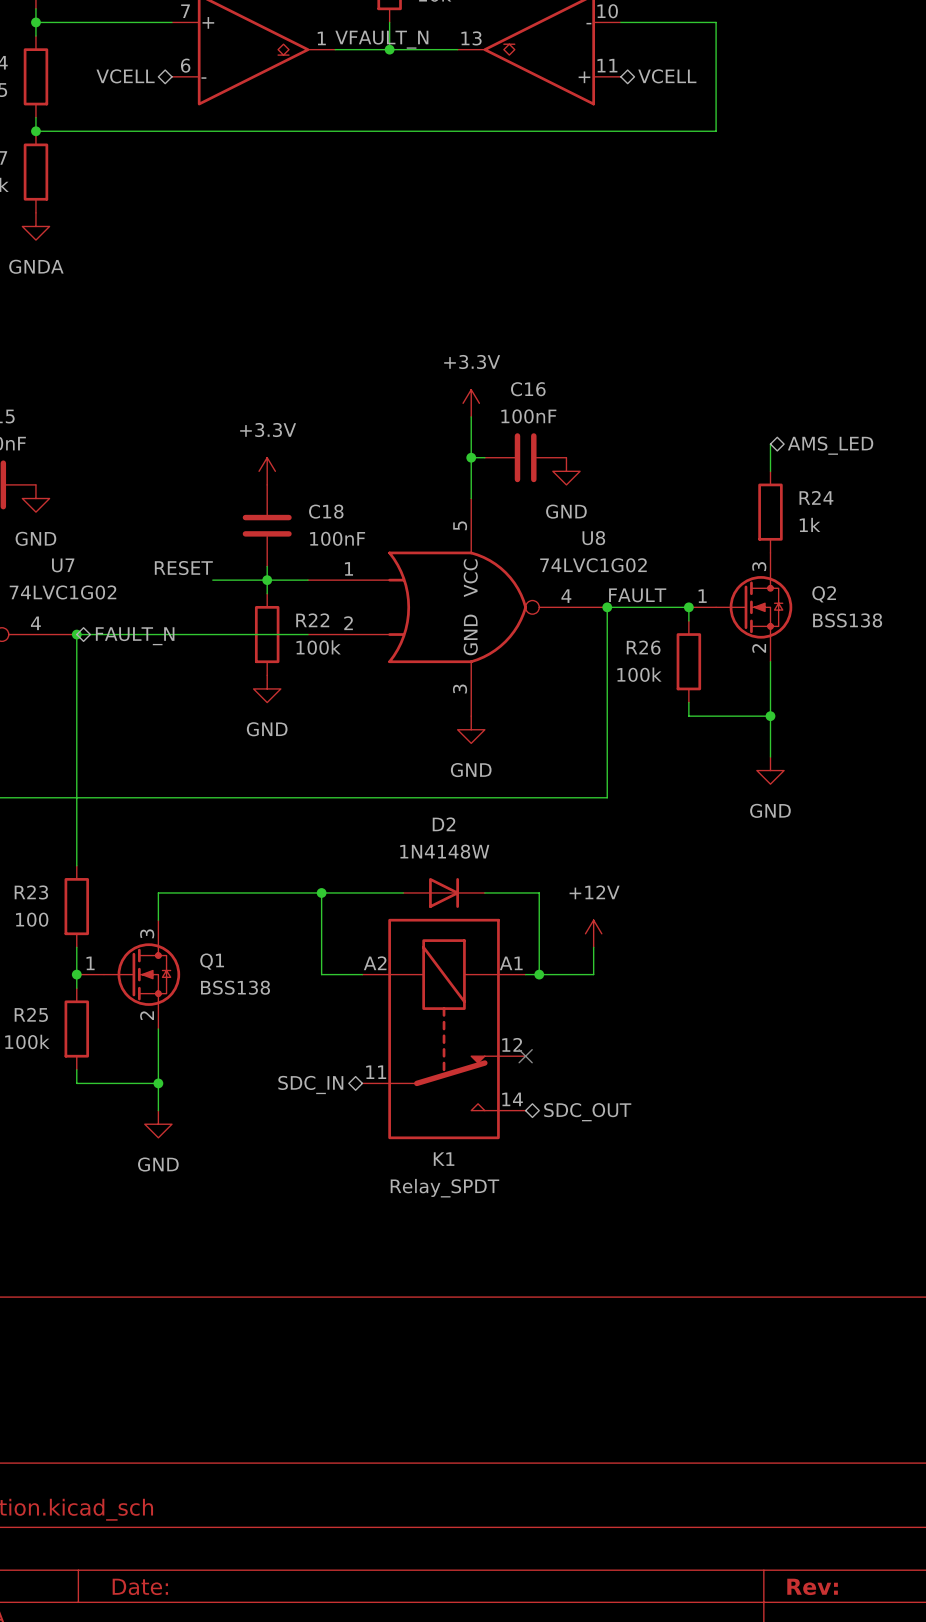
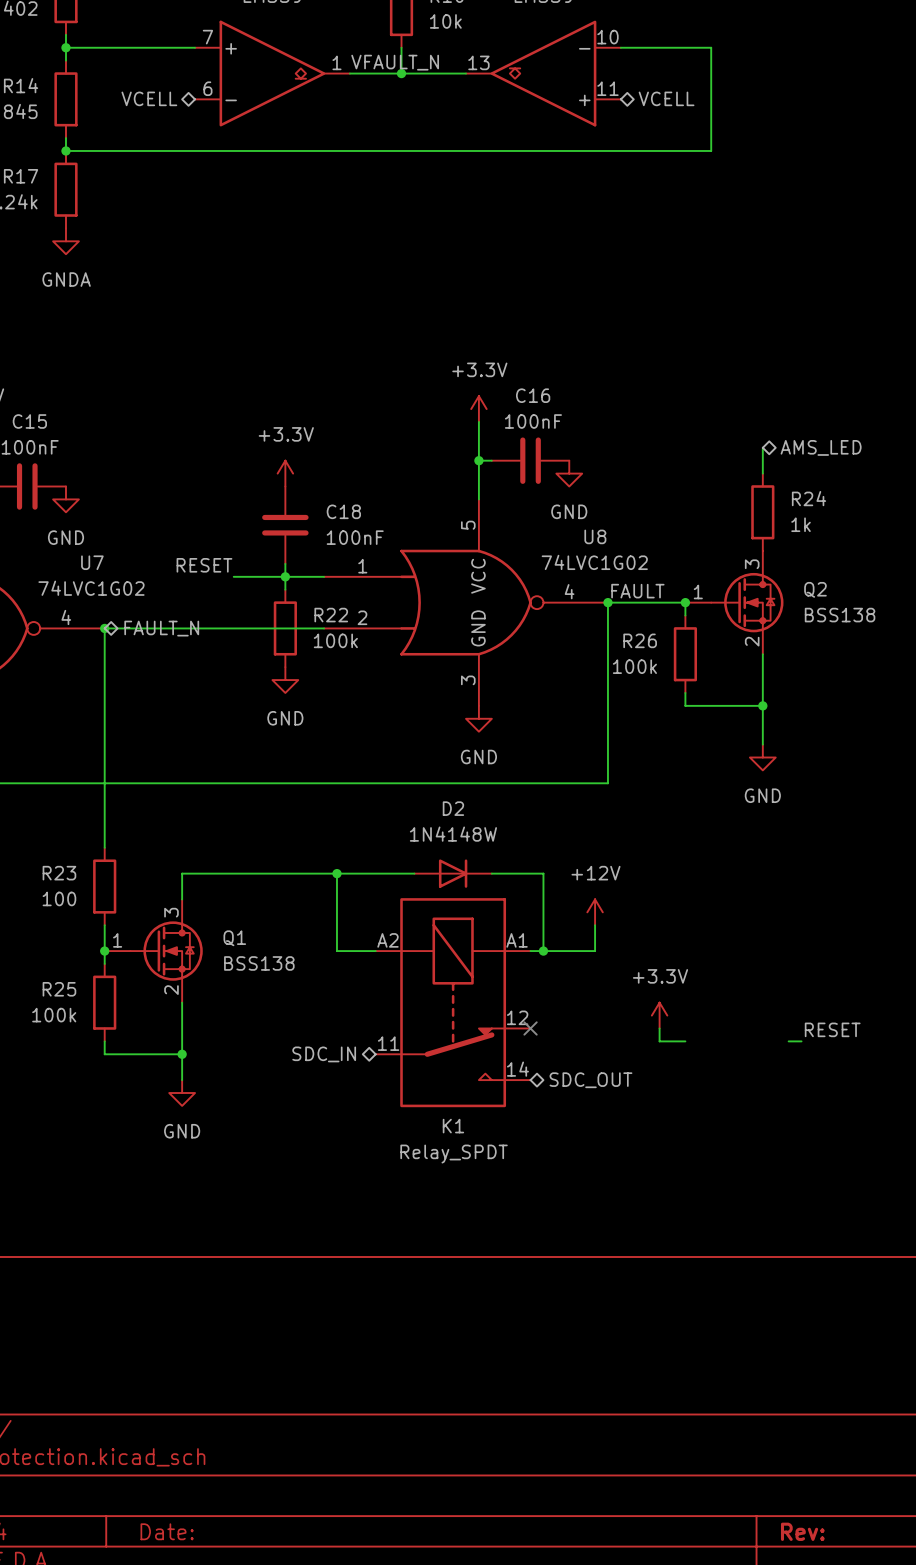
power symbol: none -> +3.3V (659, 1015)
wire: none -> (659, 1028) (659, 1041) (685, 1041)
label: none -> RESET (832, 1029)
wire: none -> (788, 1041) (801, 1041)

